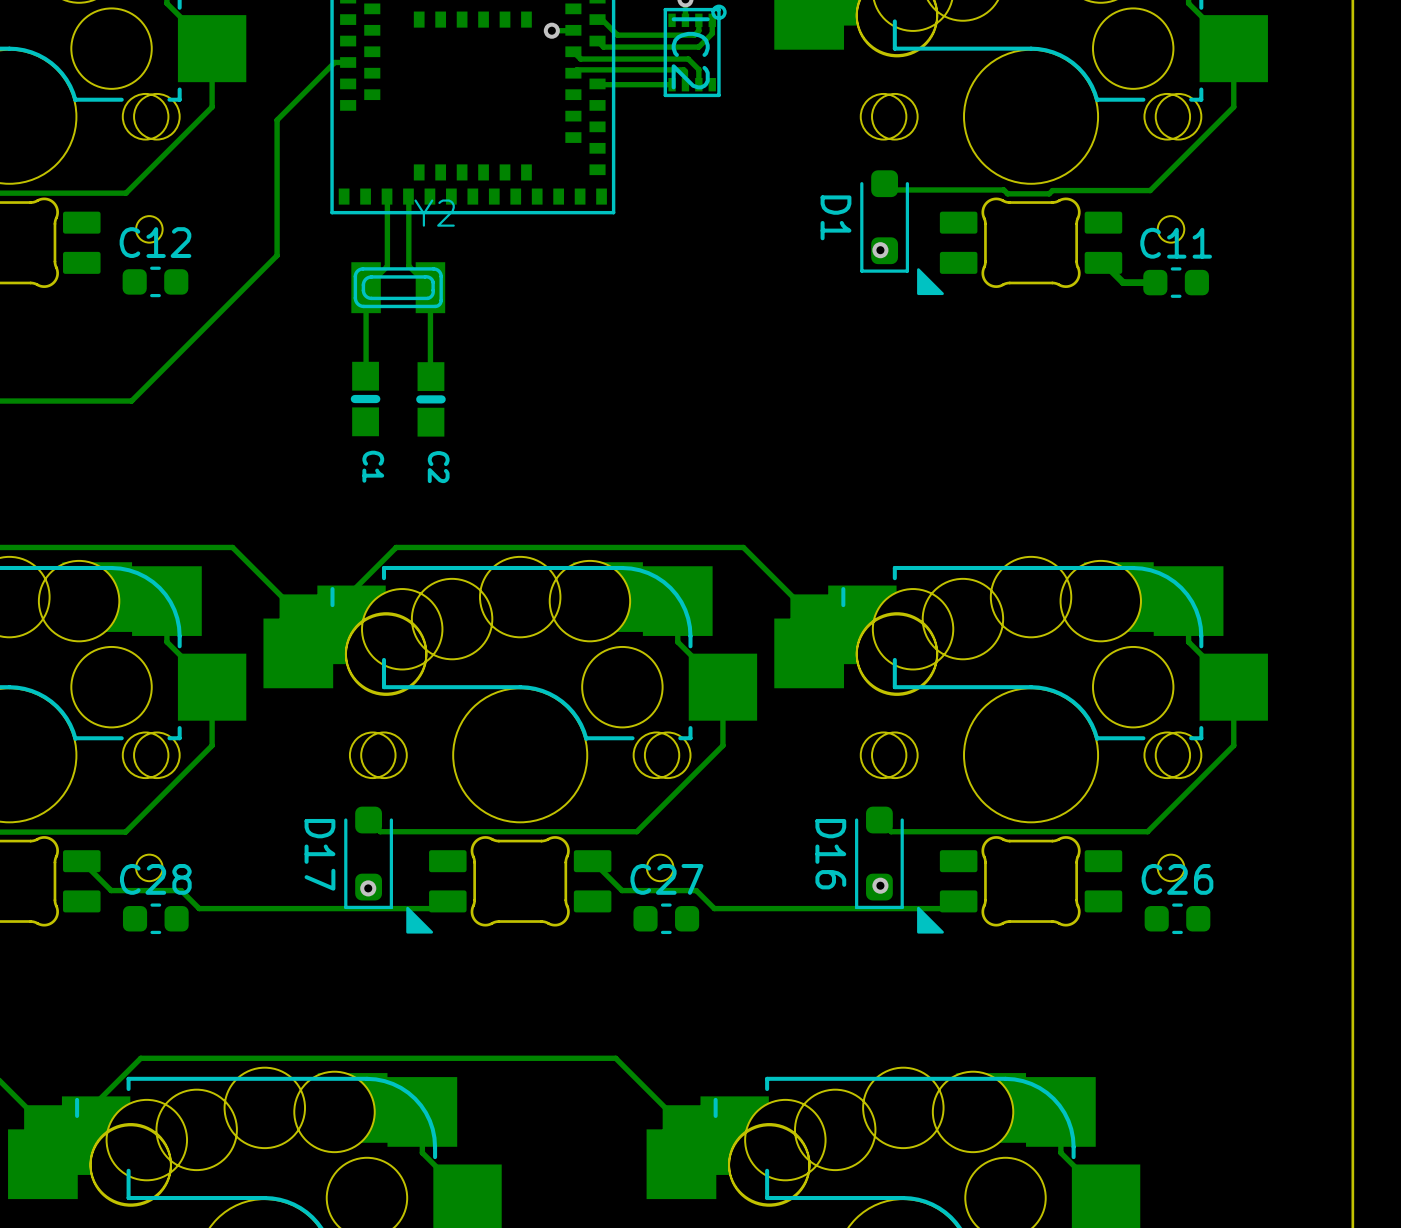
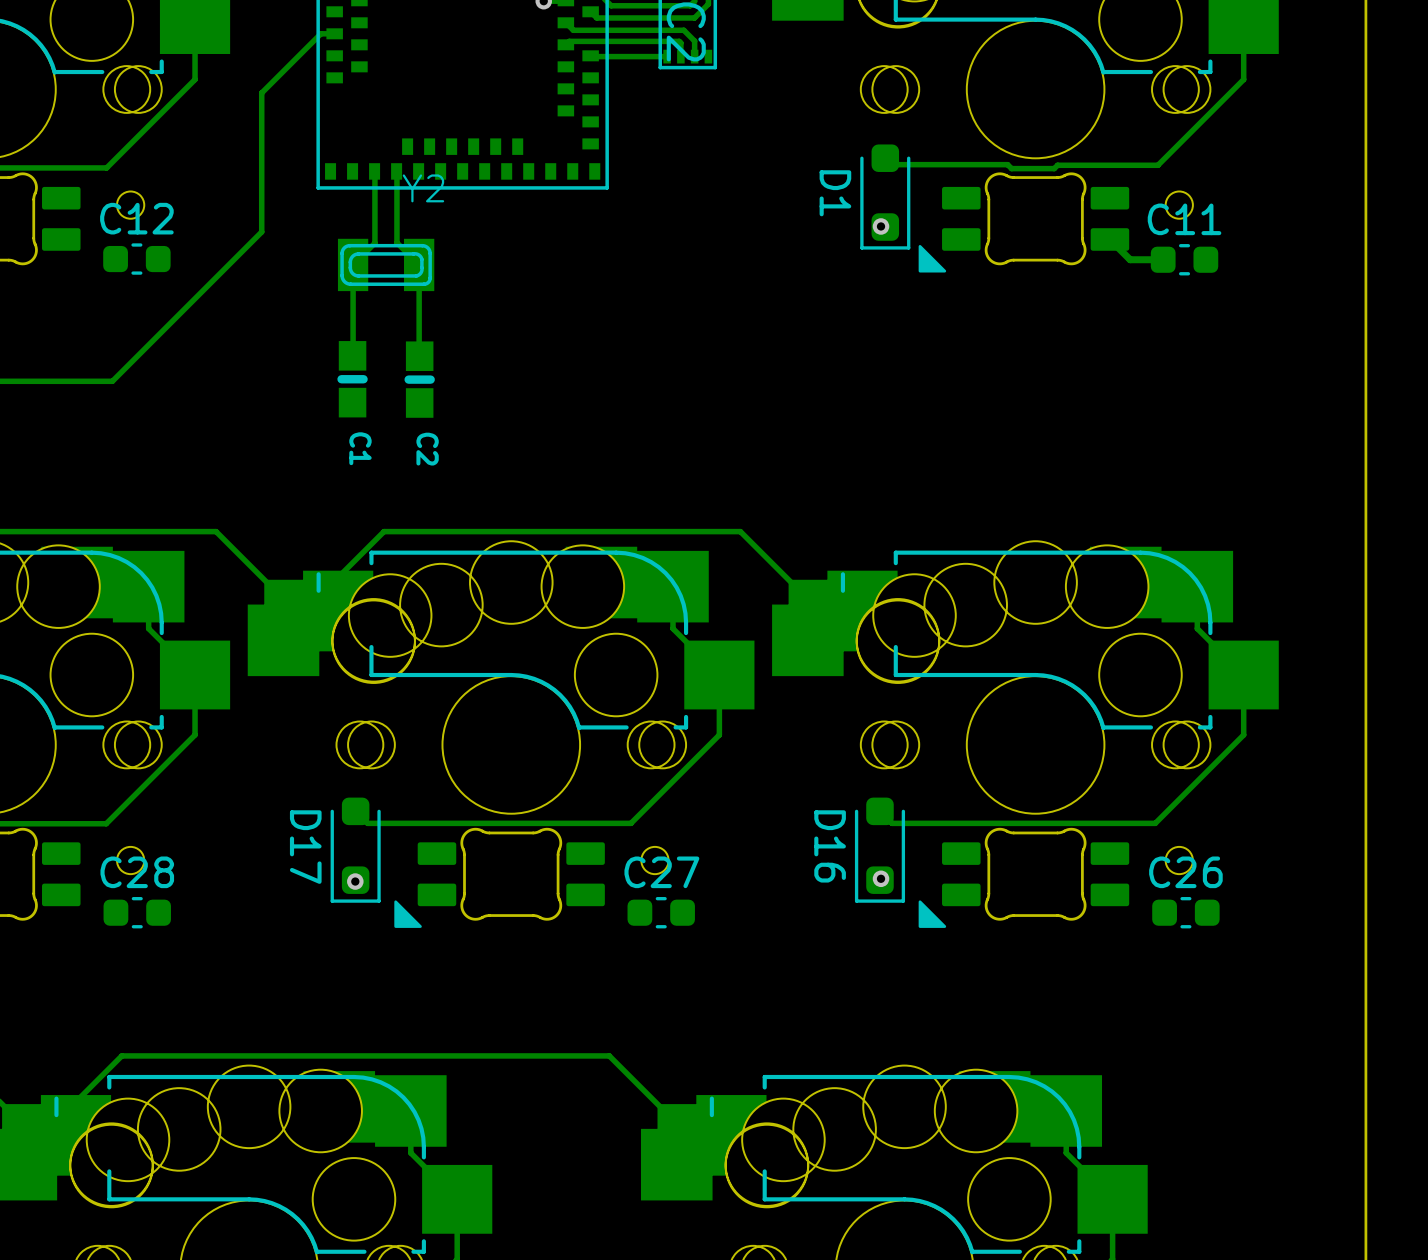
track: (81, 861) (111, 890) (181, 890) (199, 908) (440, 908) (447, 901) -> none
track: (592, 861) (622, 890) (696, 890) (714, 908) (951, 908) (958, 901) -> none

